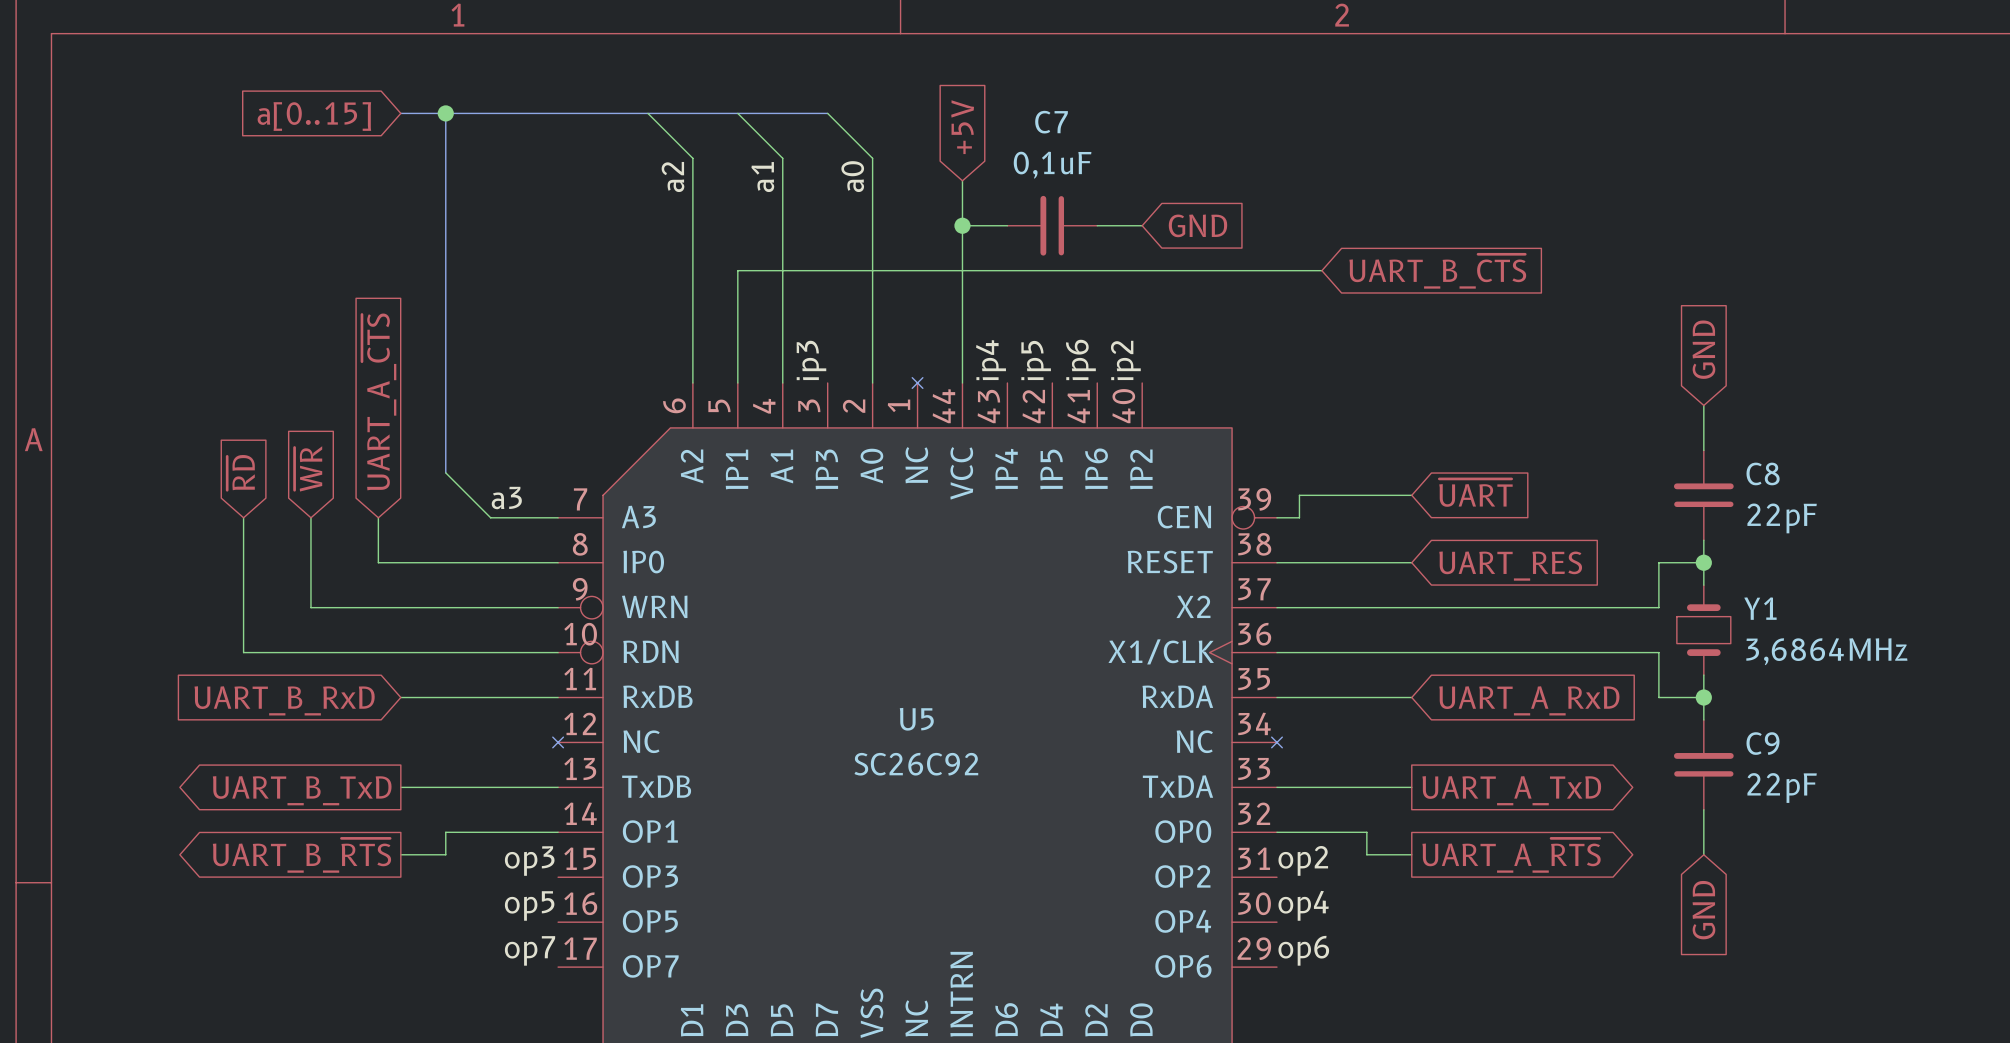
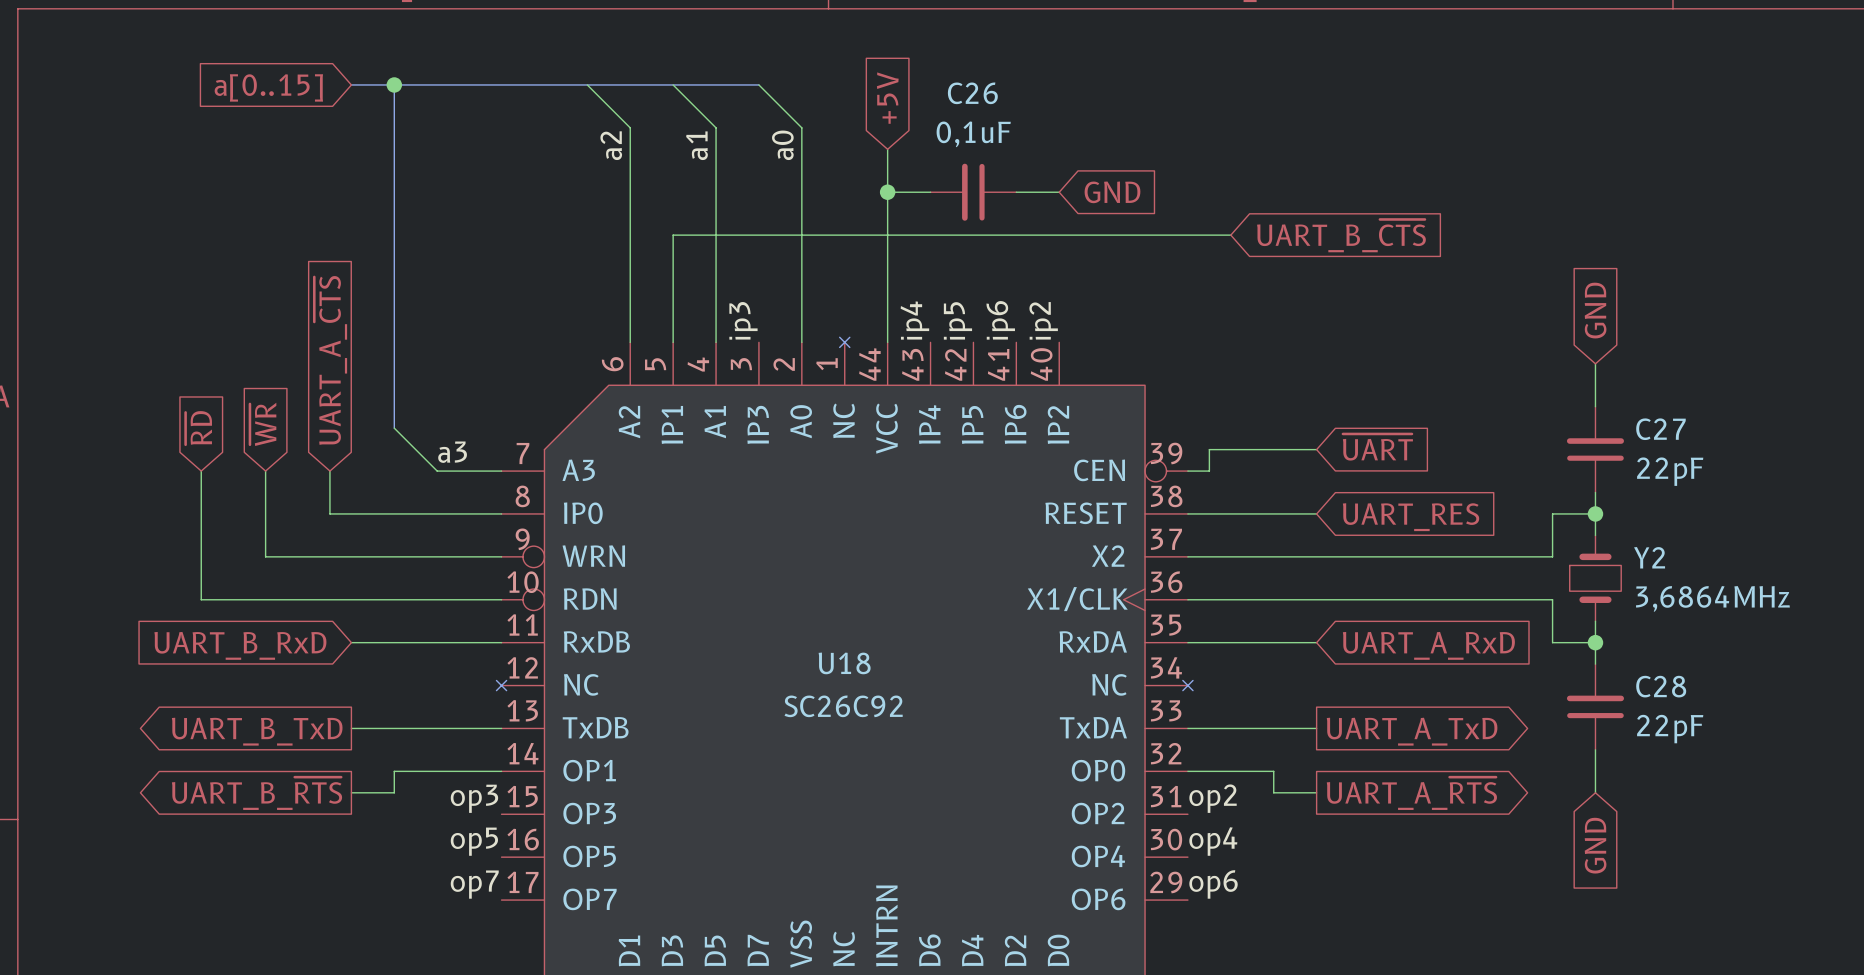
C7 name: C7 (1051, 122) -> C26 (972, 93)
C8 name: C8 (1763, 473) -> C27 (1660, 429)
Y1 name: Y1 (1760, 608) -> Y2 (1649, 557)
U5 name: U5 (916, 719) -> U18 (844, 663)
C9 name: C9 (1762, 743) -> C28 (1661, 686)

